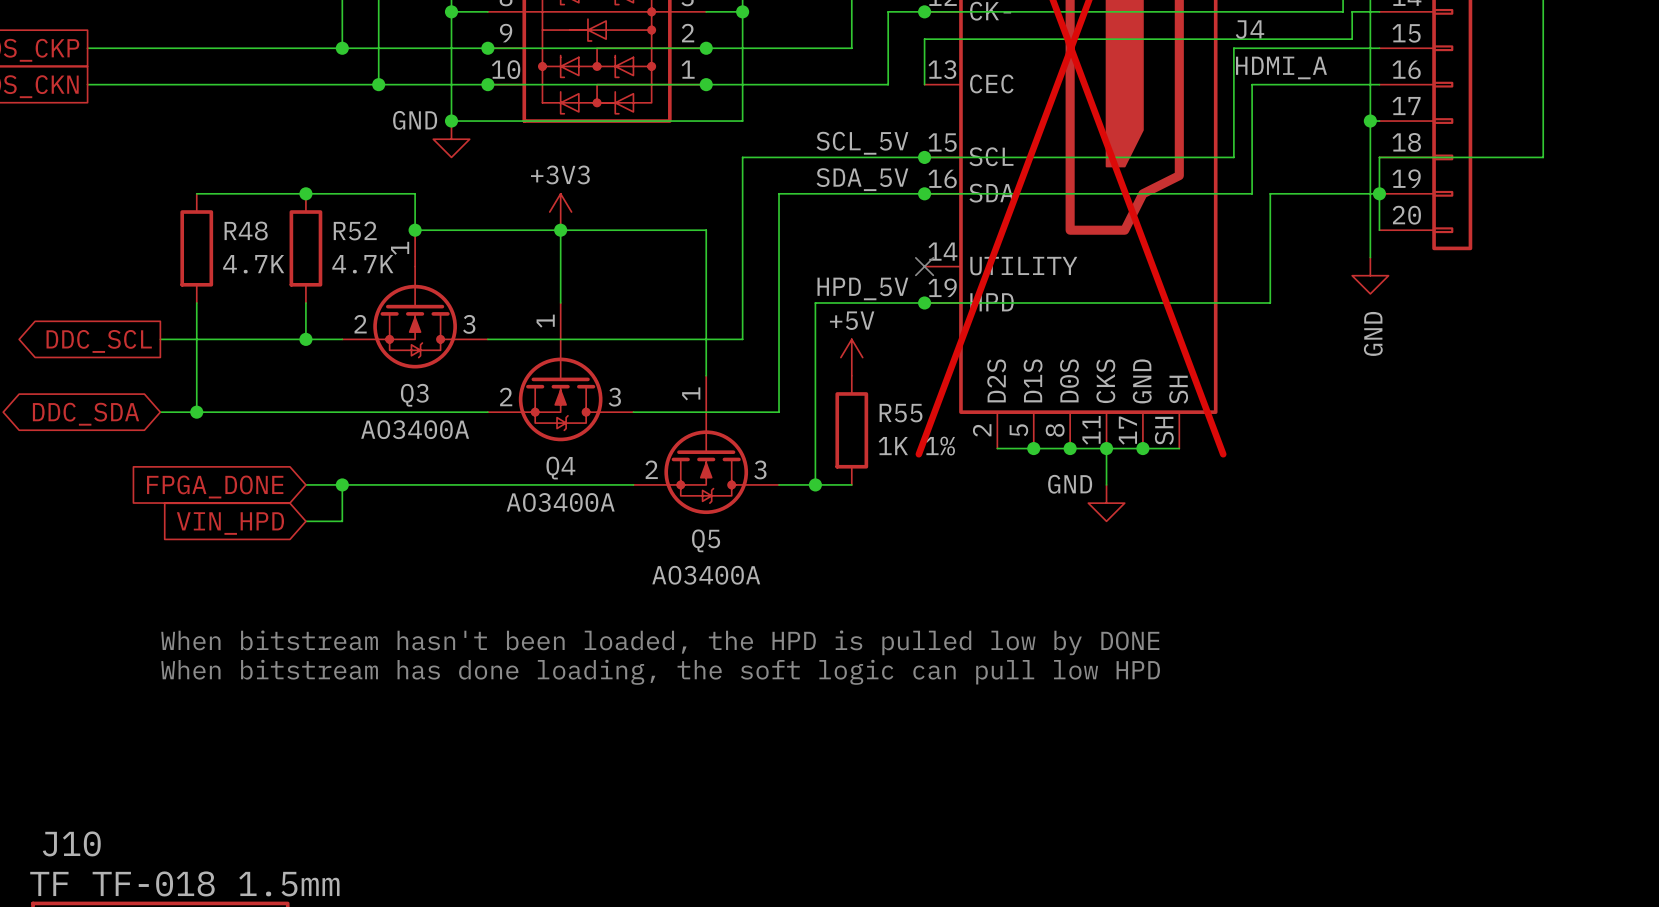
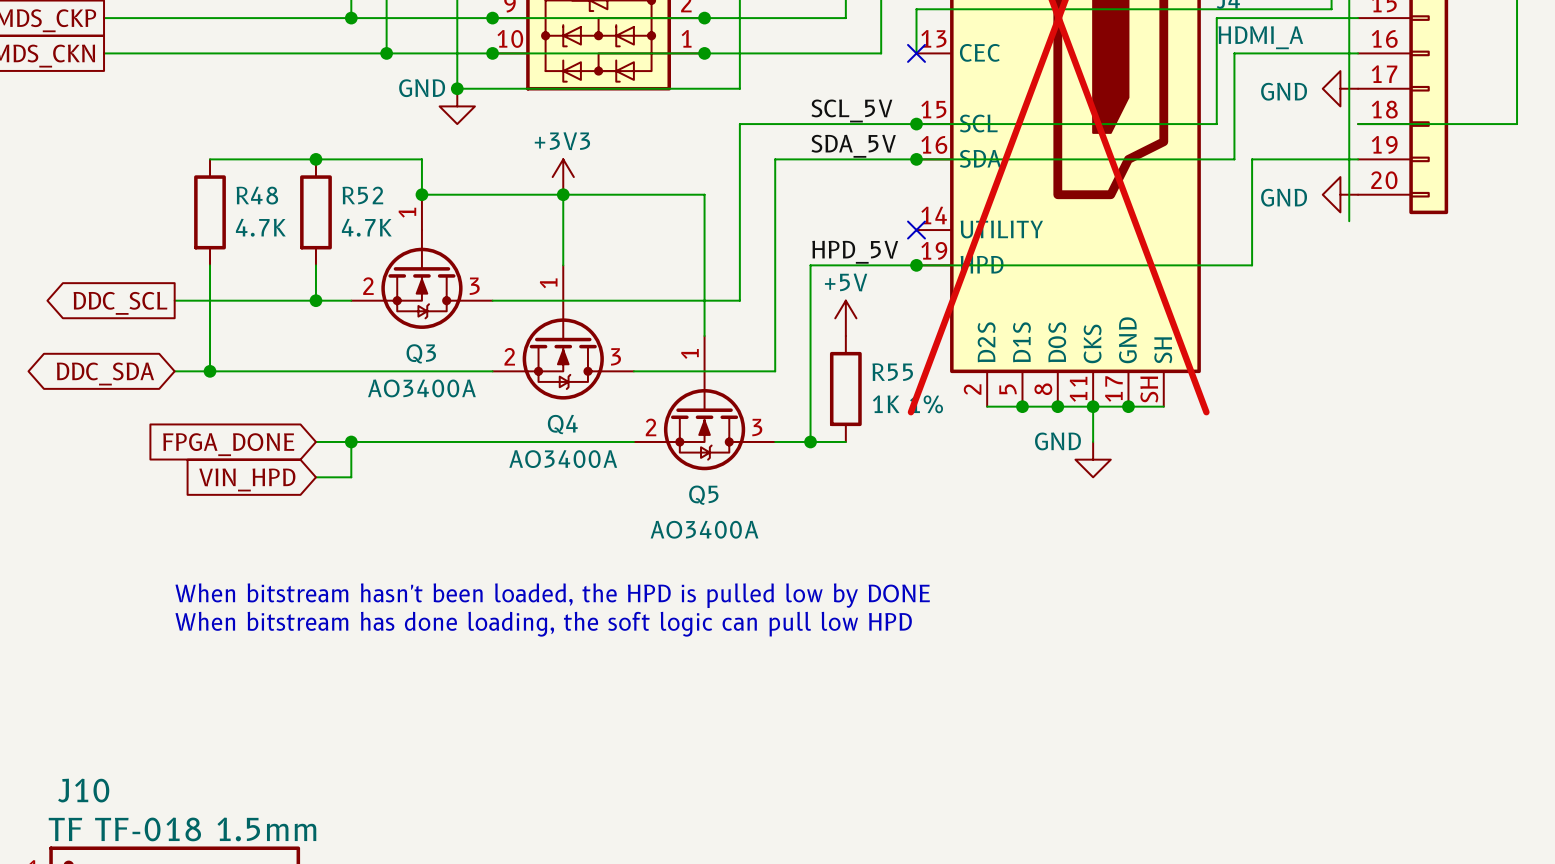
no-connect mark: none -> (916, 53)
power symbol: none -> GND (1340, 88)
junction: (1370, 121) -> none
wire: (1379, 157) (1379, 230) -> none
junction: (1379, 193) -> none
power symbol rotation: 0° (1370, 275) -> 90° clockwise (1340, 194)
power symbol position: GND (1370, 275) -> GND (1340, 194)

